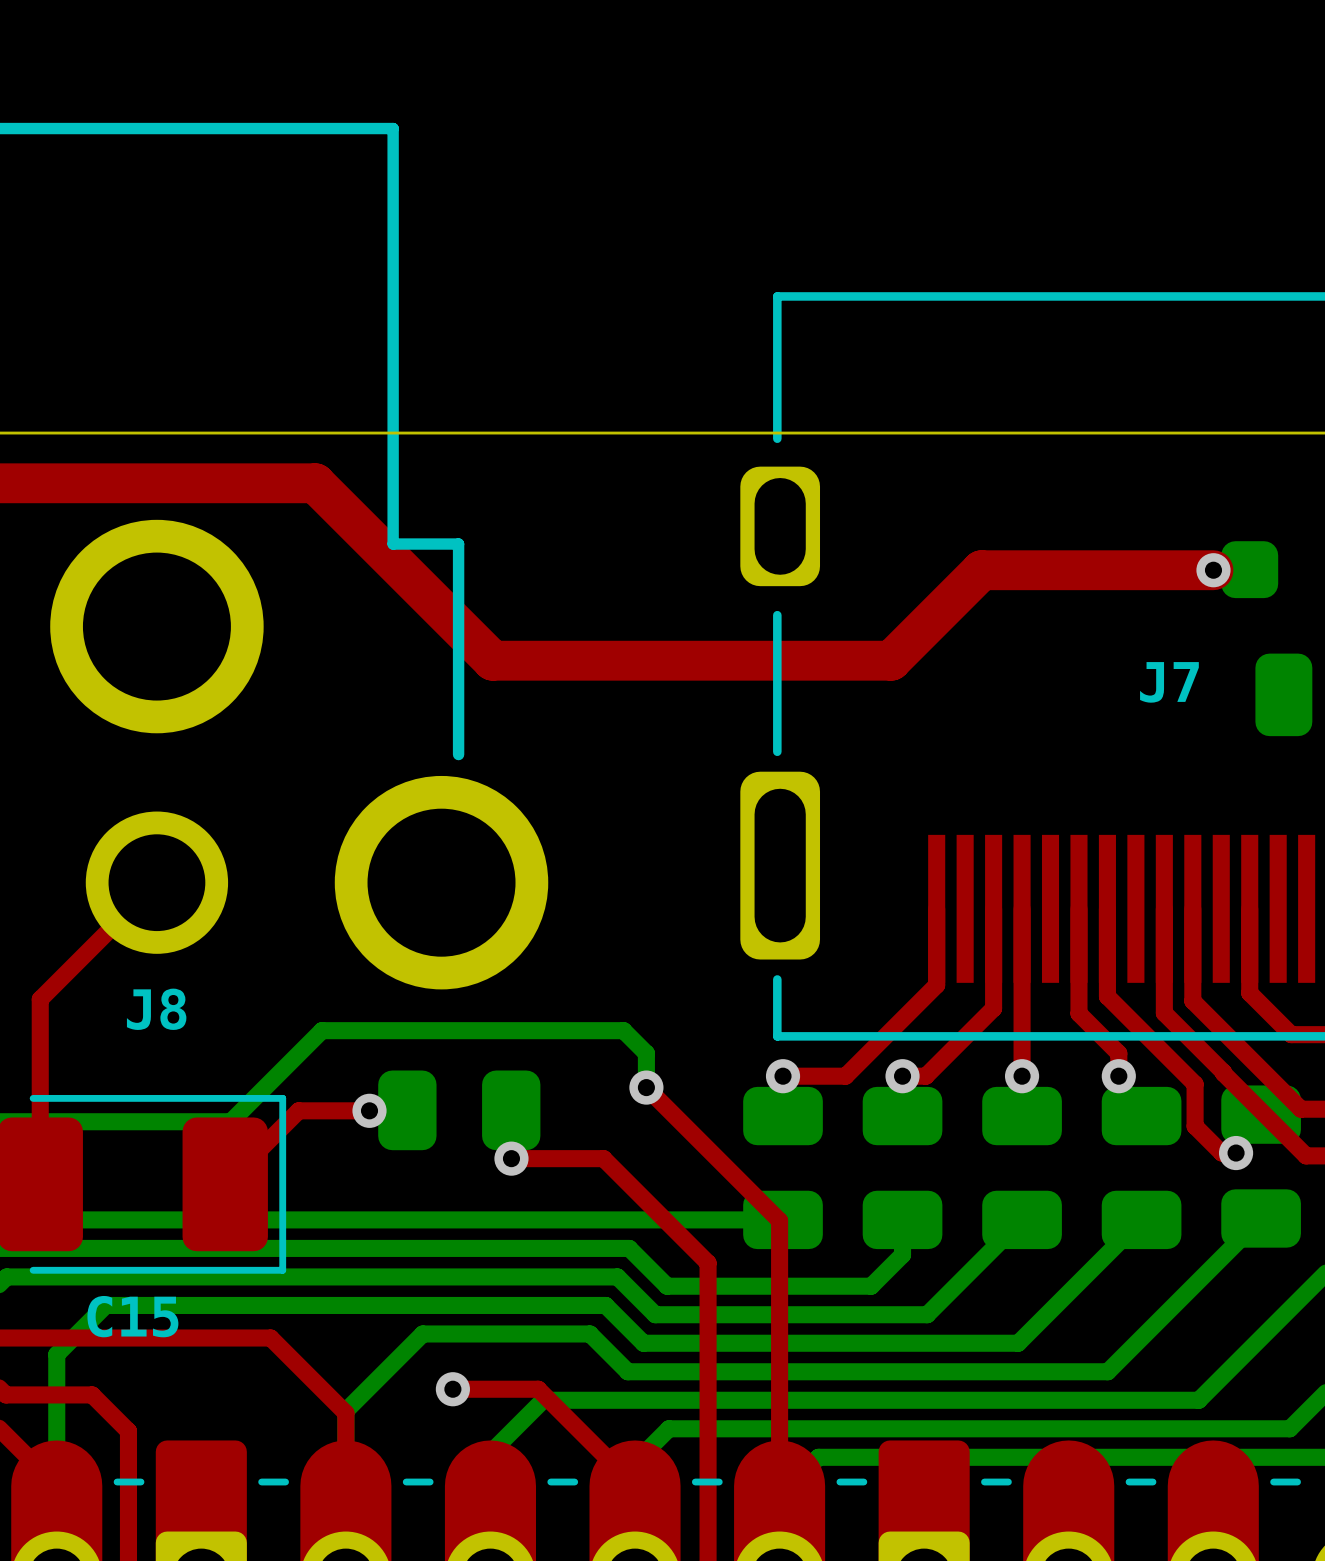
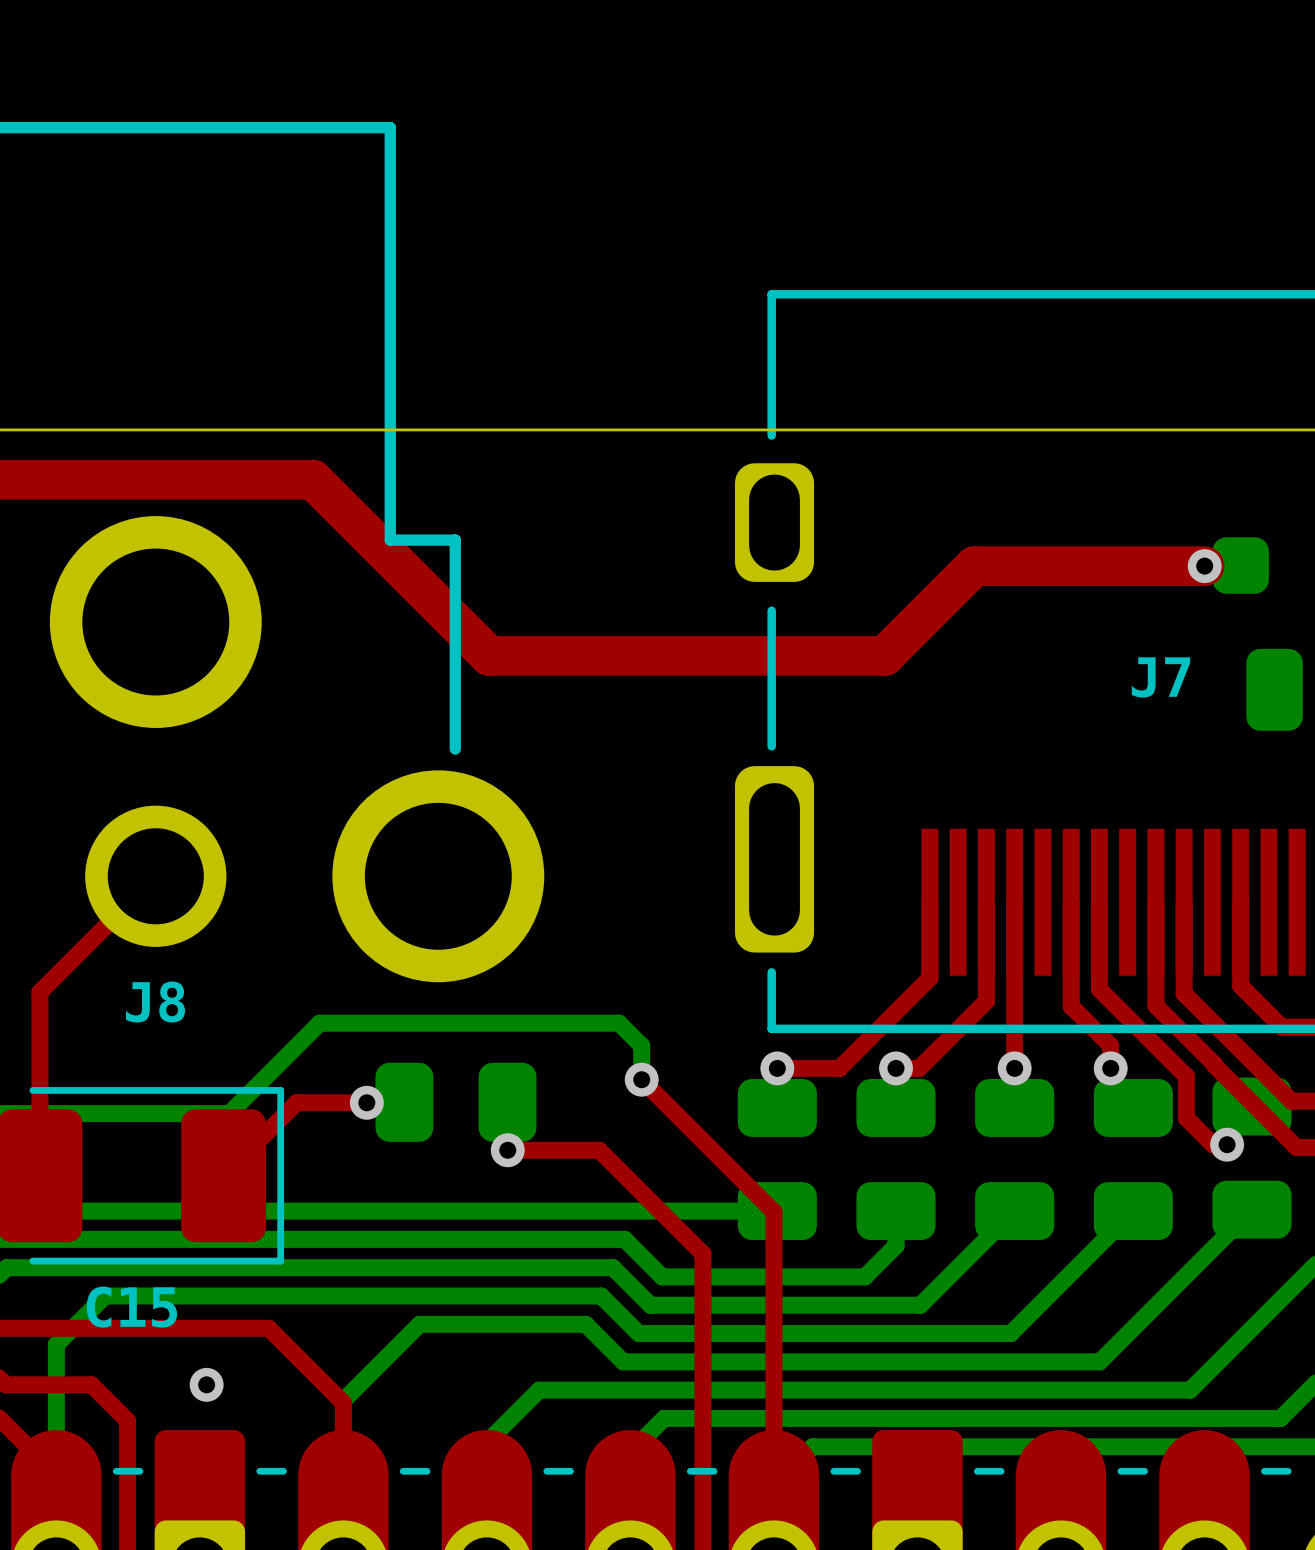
top track: (452, 1389) (538, 1389) (635, 1486) -> none
via position: (452, 1389) -> (206, 1384)

